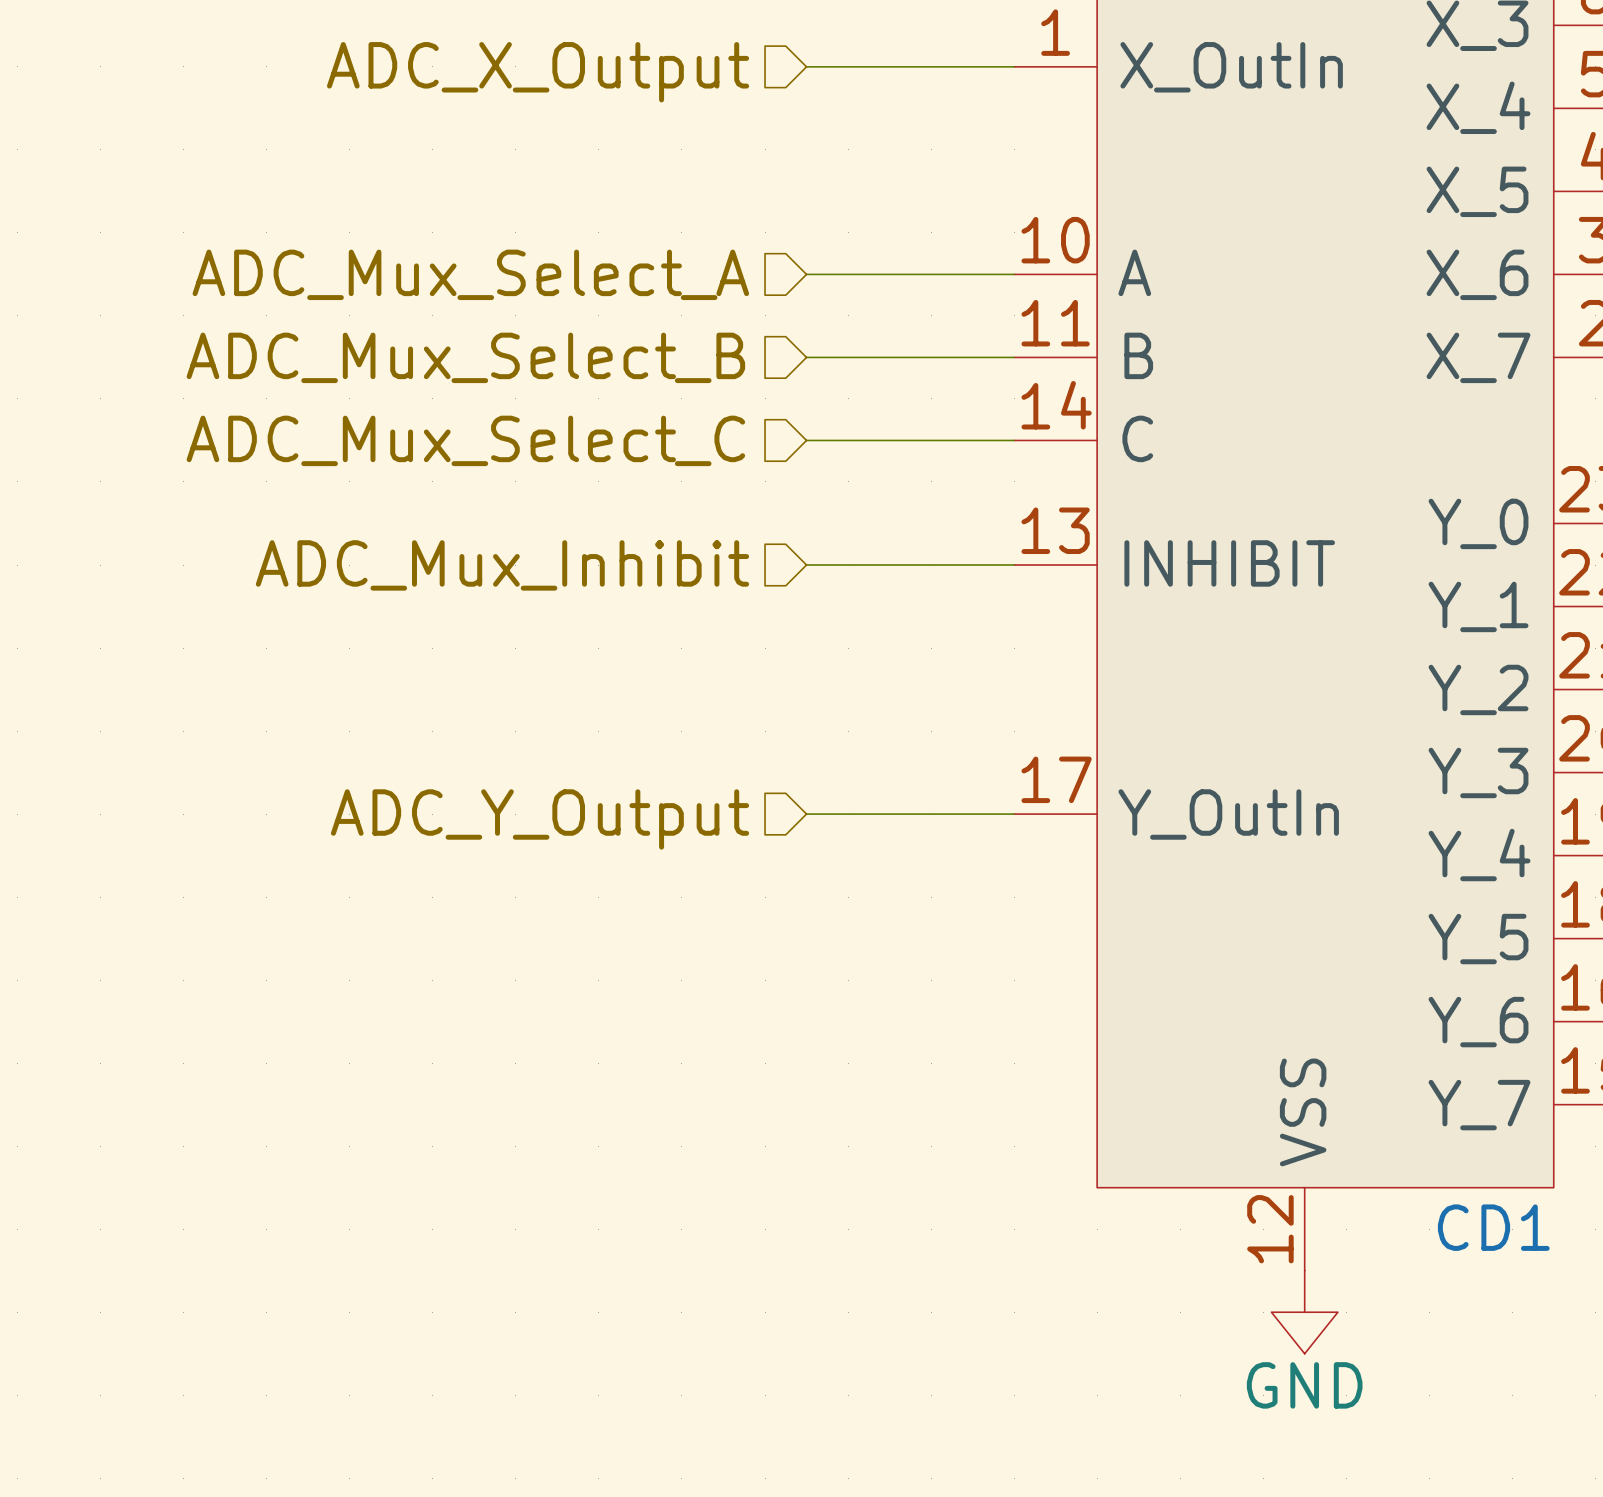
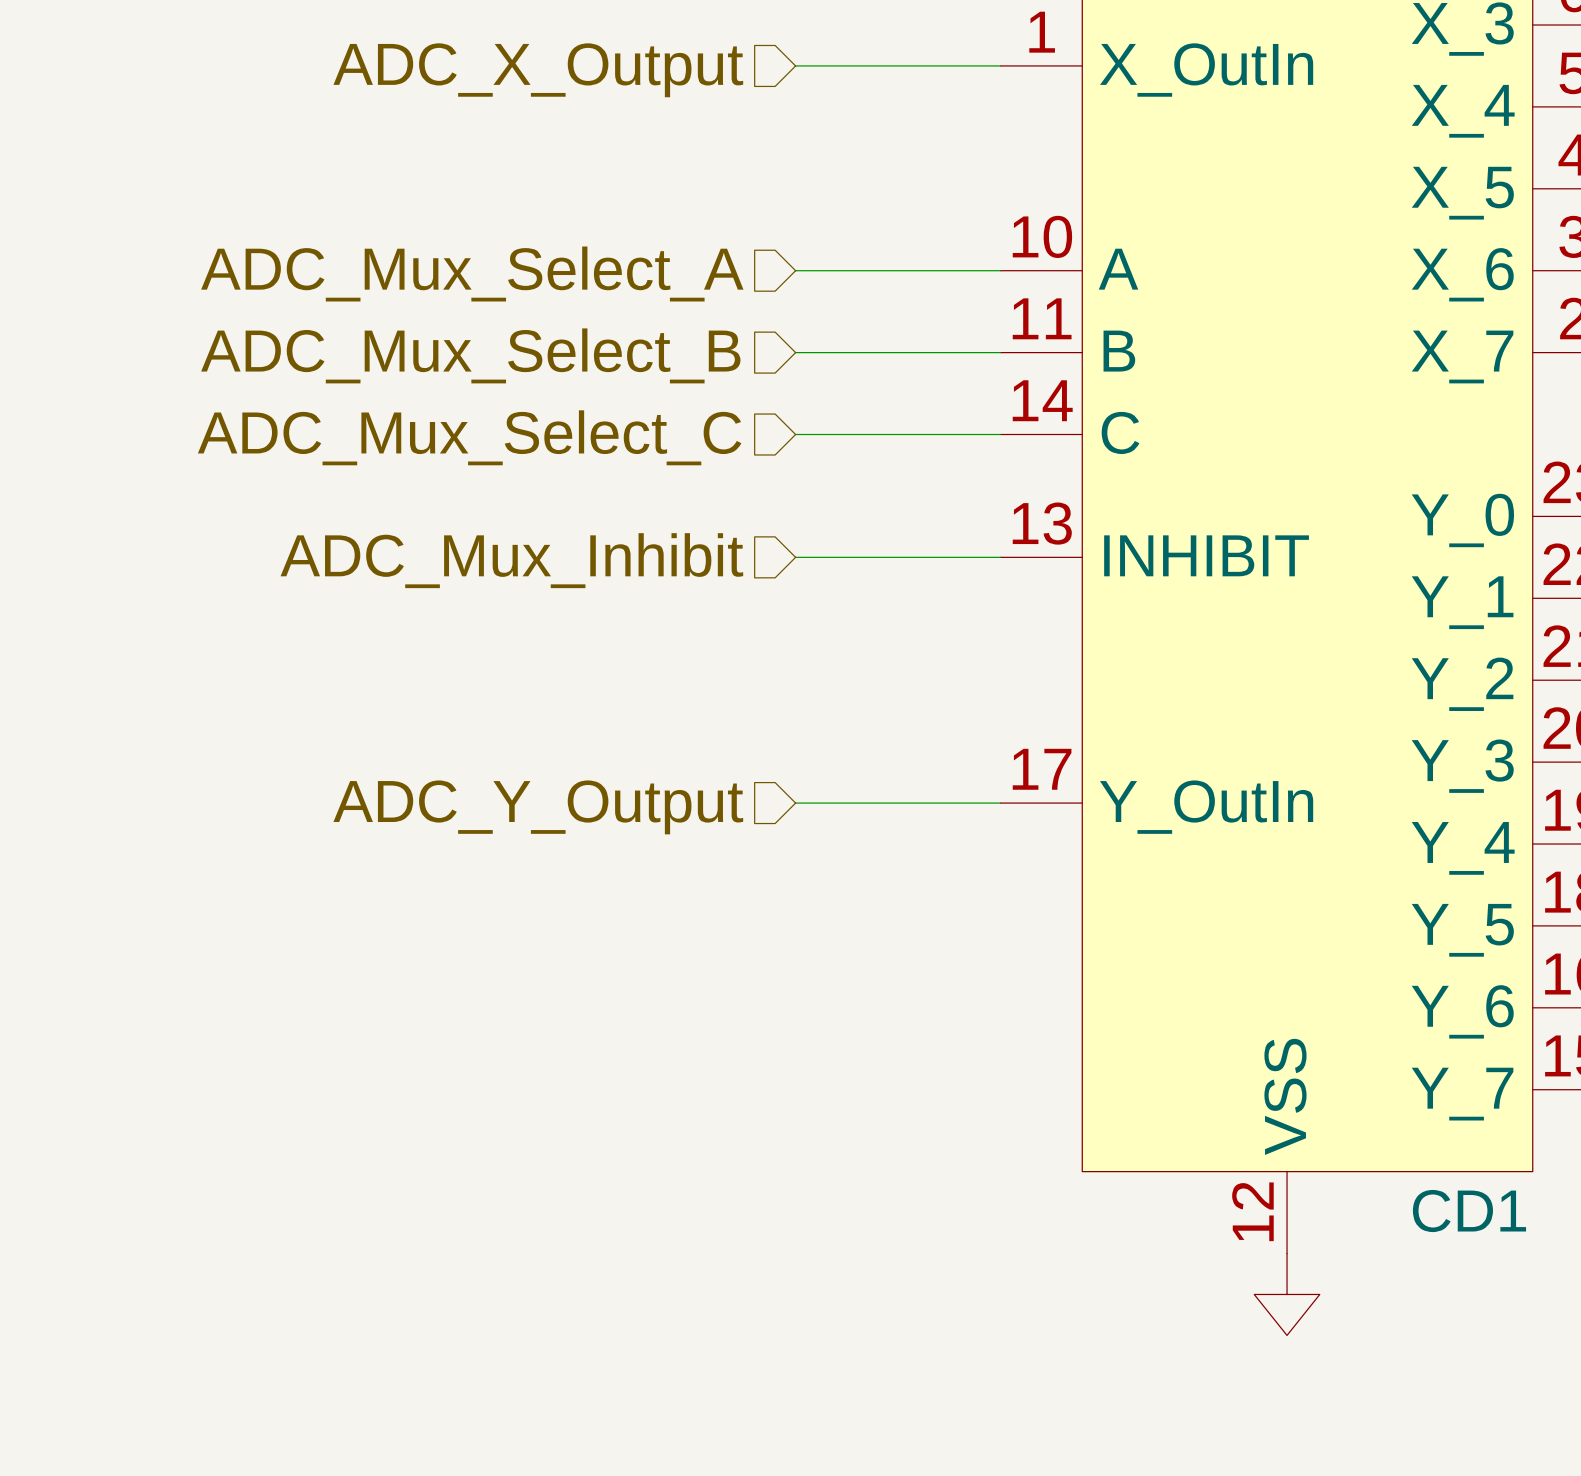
power symbol shape: [1271, 1270, 1338, 1354] -> [1254, 1253, 1320, 1336]
power symbol text: GND (1304, 1385) -> none

